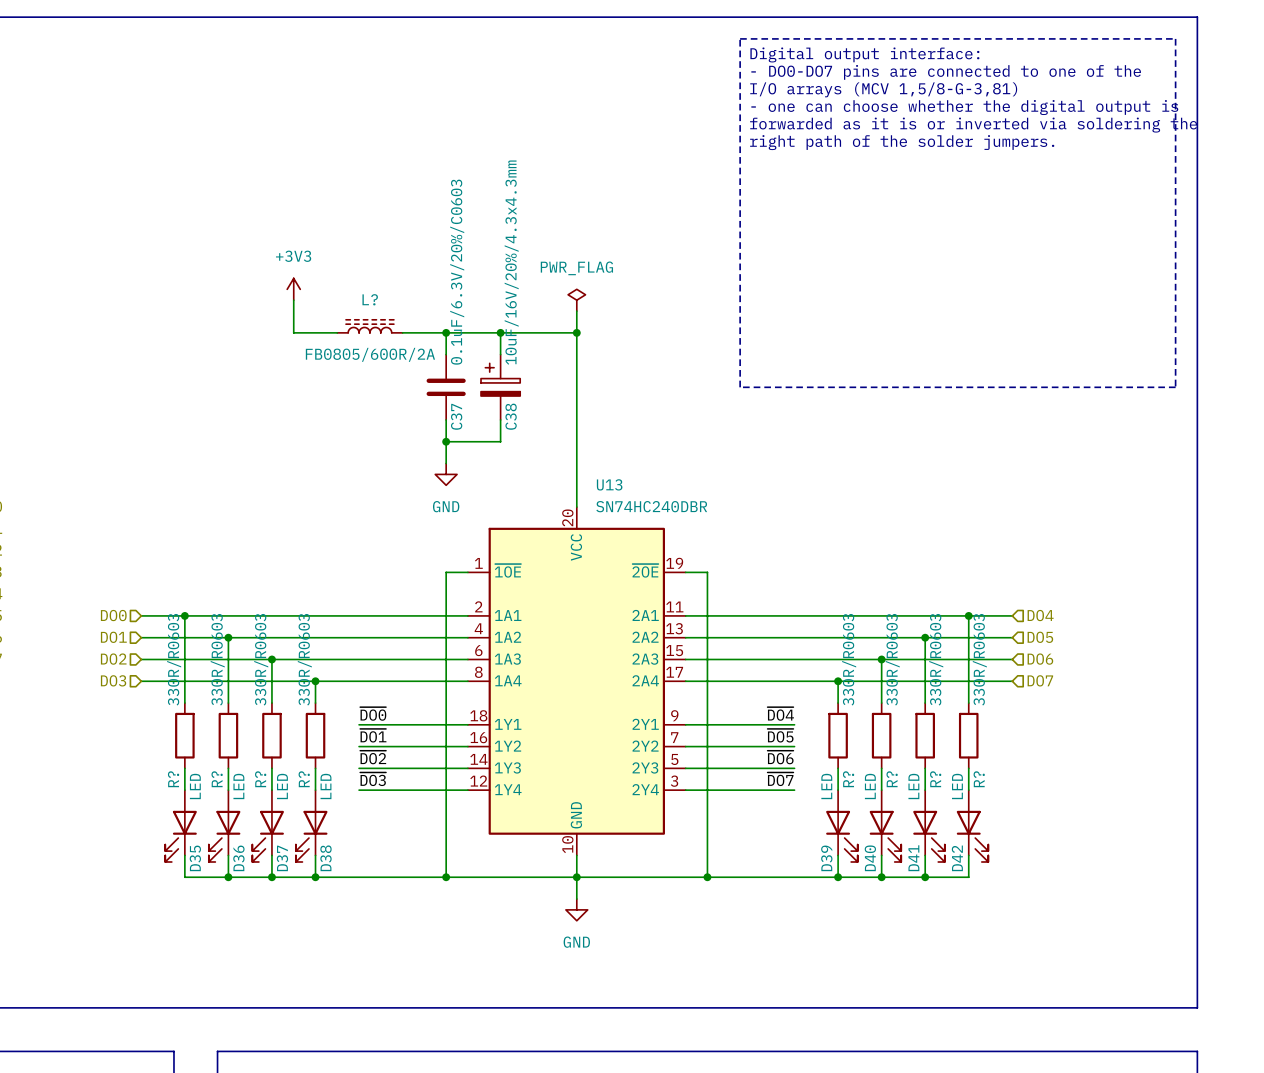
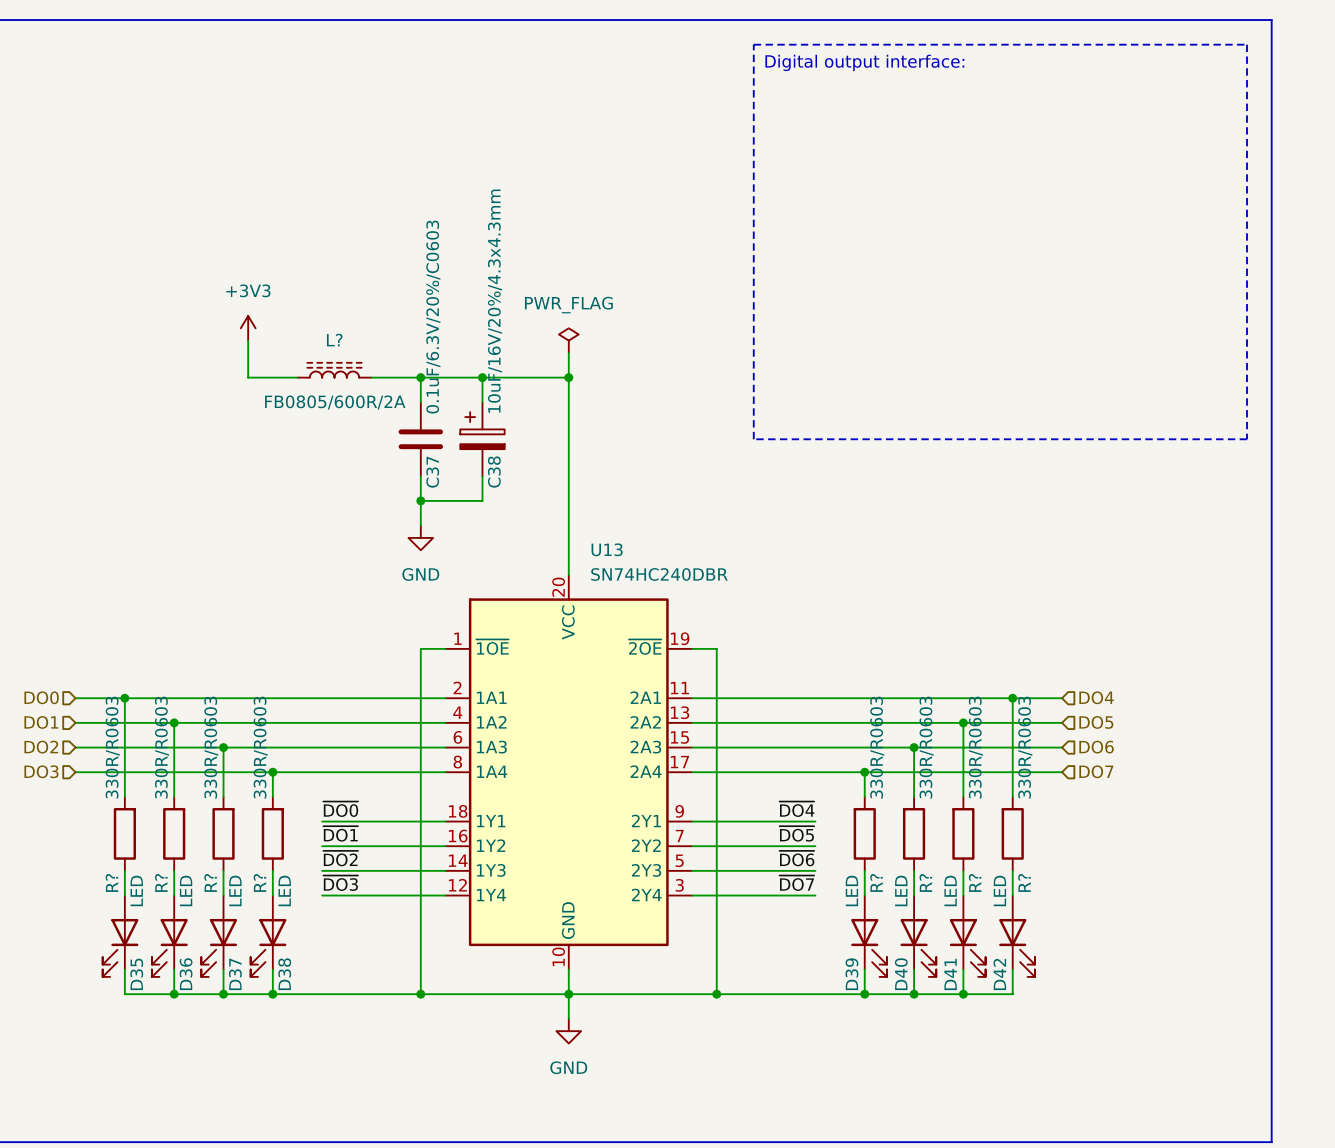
text: - DO0-DO7 pins are connected to one of the (946, 72) -> none
text: I/O arrays (MCV 1,5/8-G-3,81) (883, 89) -> none
text: - one can choose whether the digital output is (964, 107) -> none
text: forwarded as it is or inverted via soldering the (973, 125) -> none
text: right path of the solder jumpers. (902, 142) -> none

